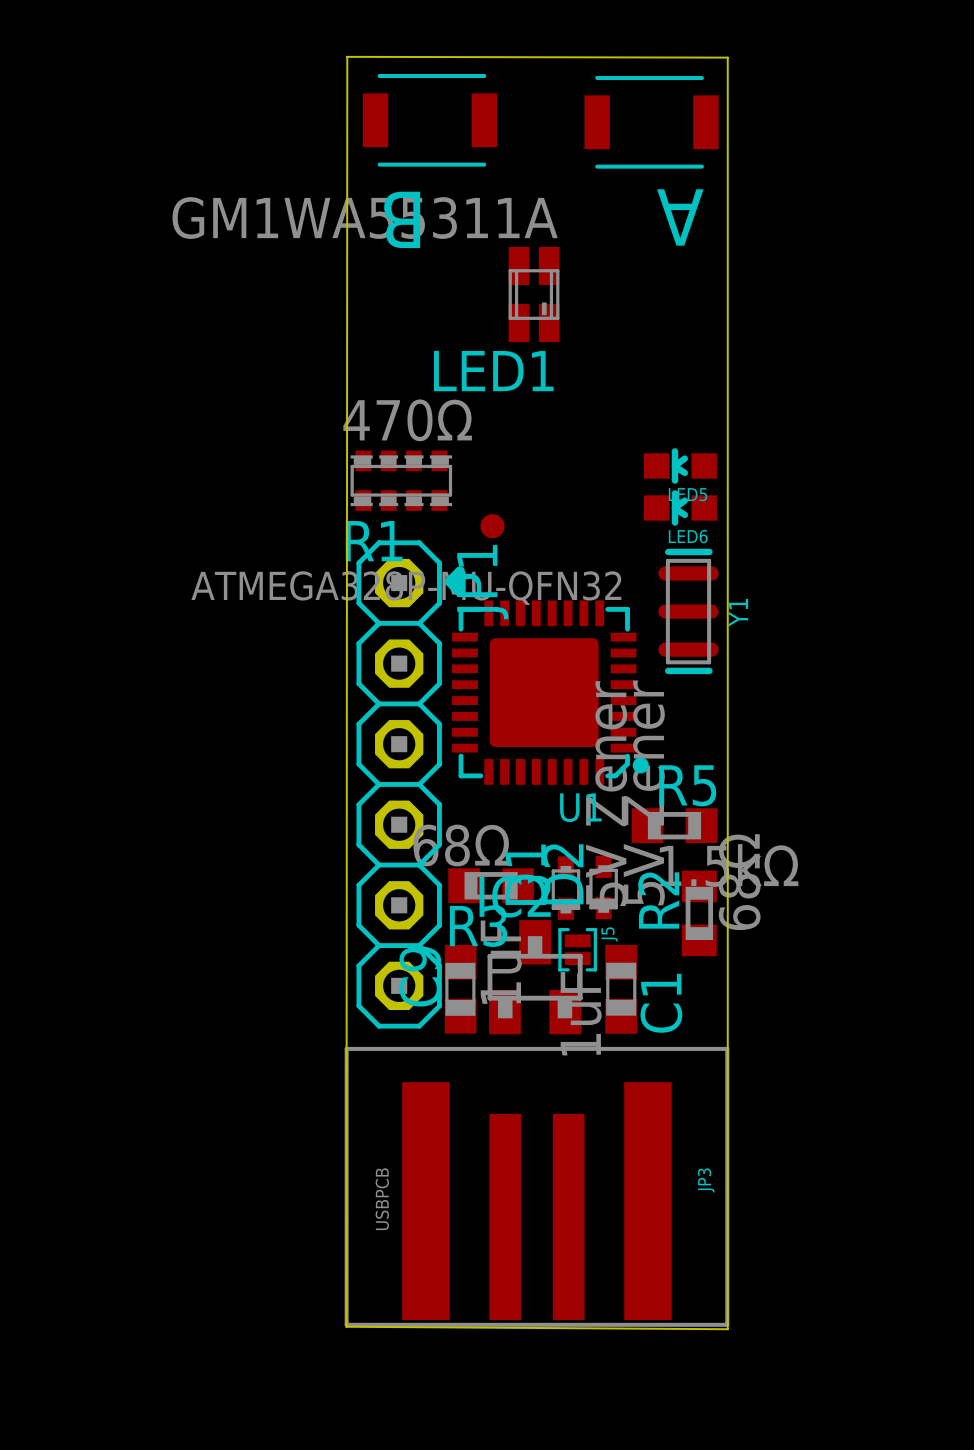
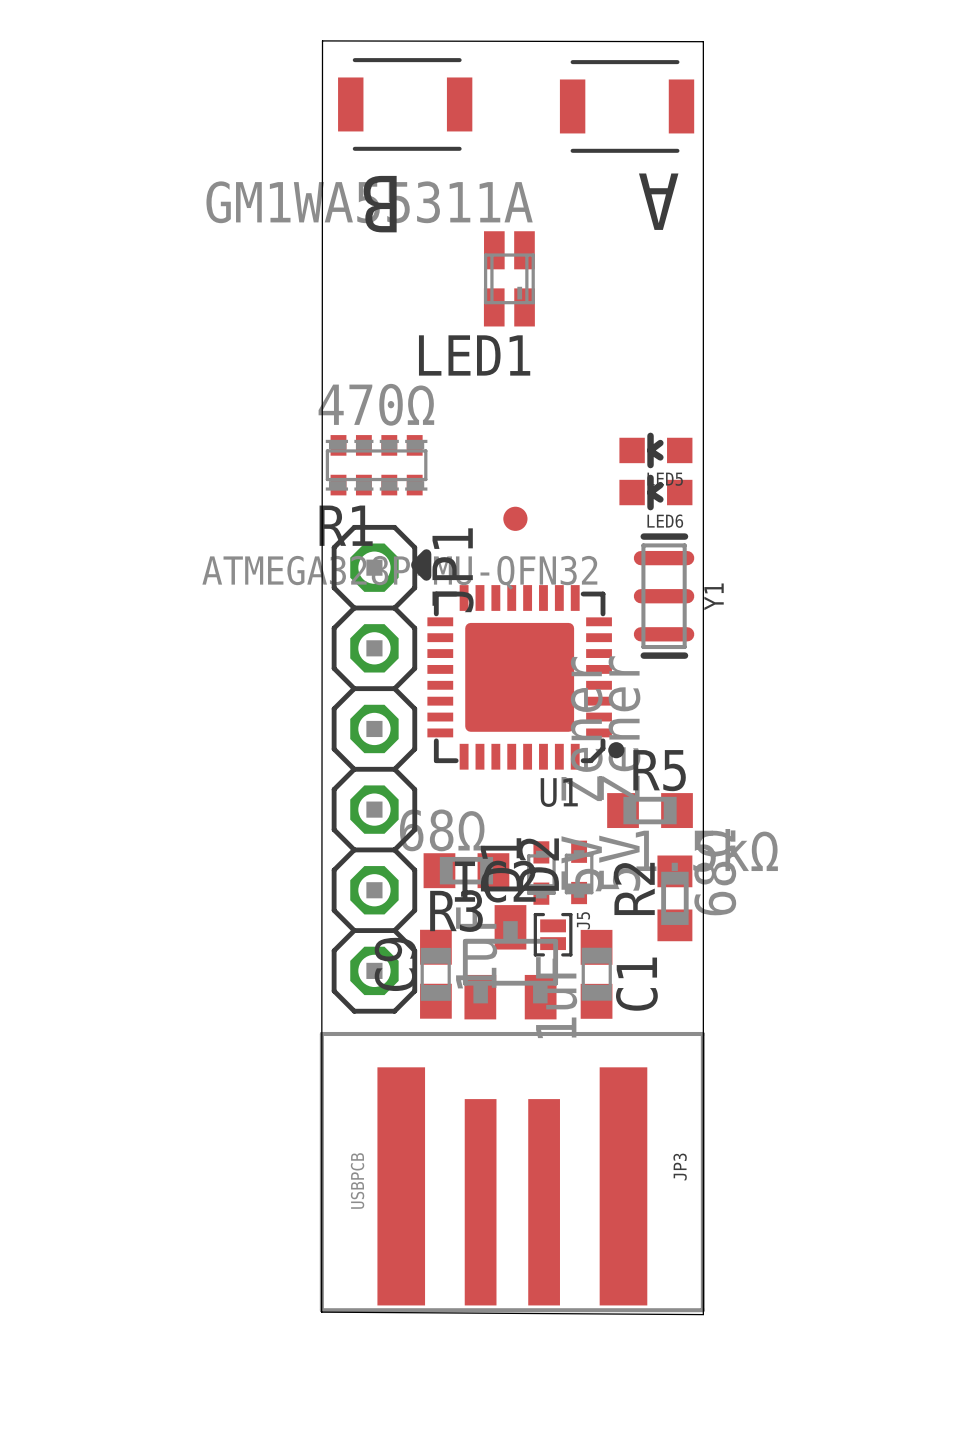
part position: (492, 526) -> (515, 518)
drawing shape: [444, 566, 465, 597] -> [411, 549, 432, 581]

